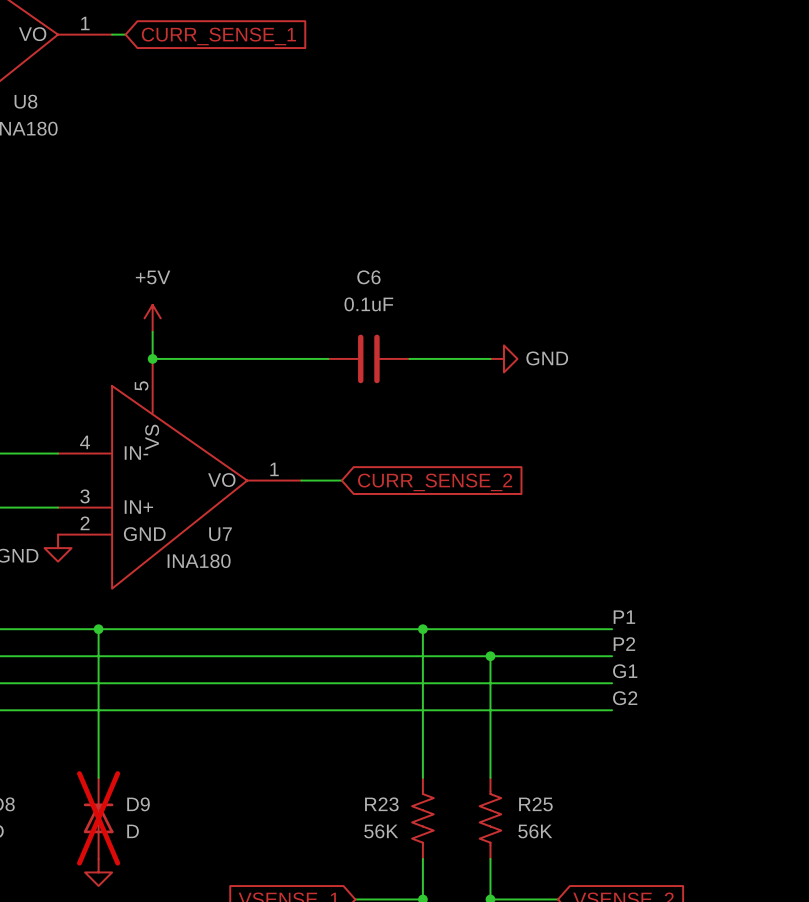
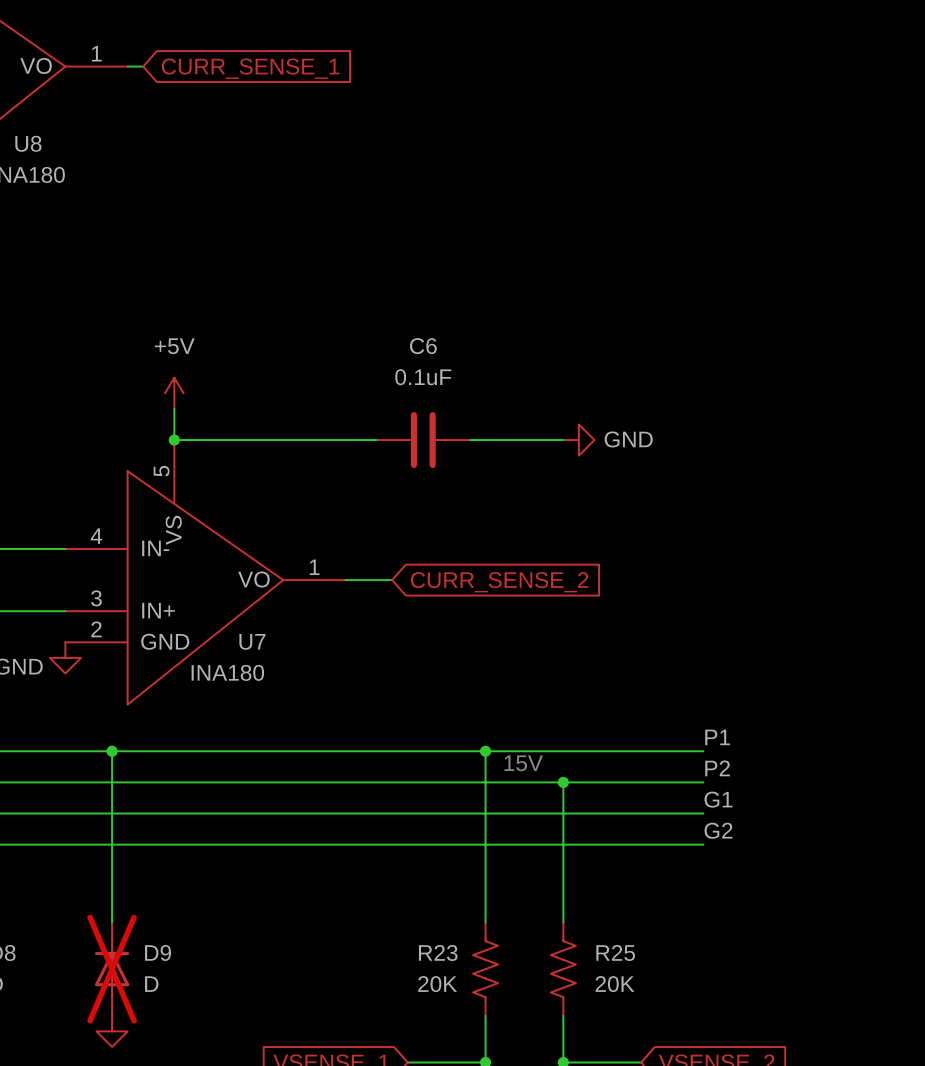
text: none -> 15V (523, 763)
R23 value: 56K (381, 831) -> 20K (437, 984)
R25 value: 56K (535, 831) -> 20K (615, 984)

